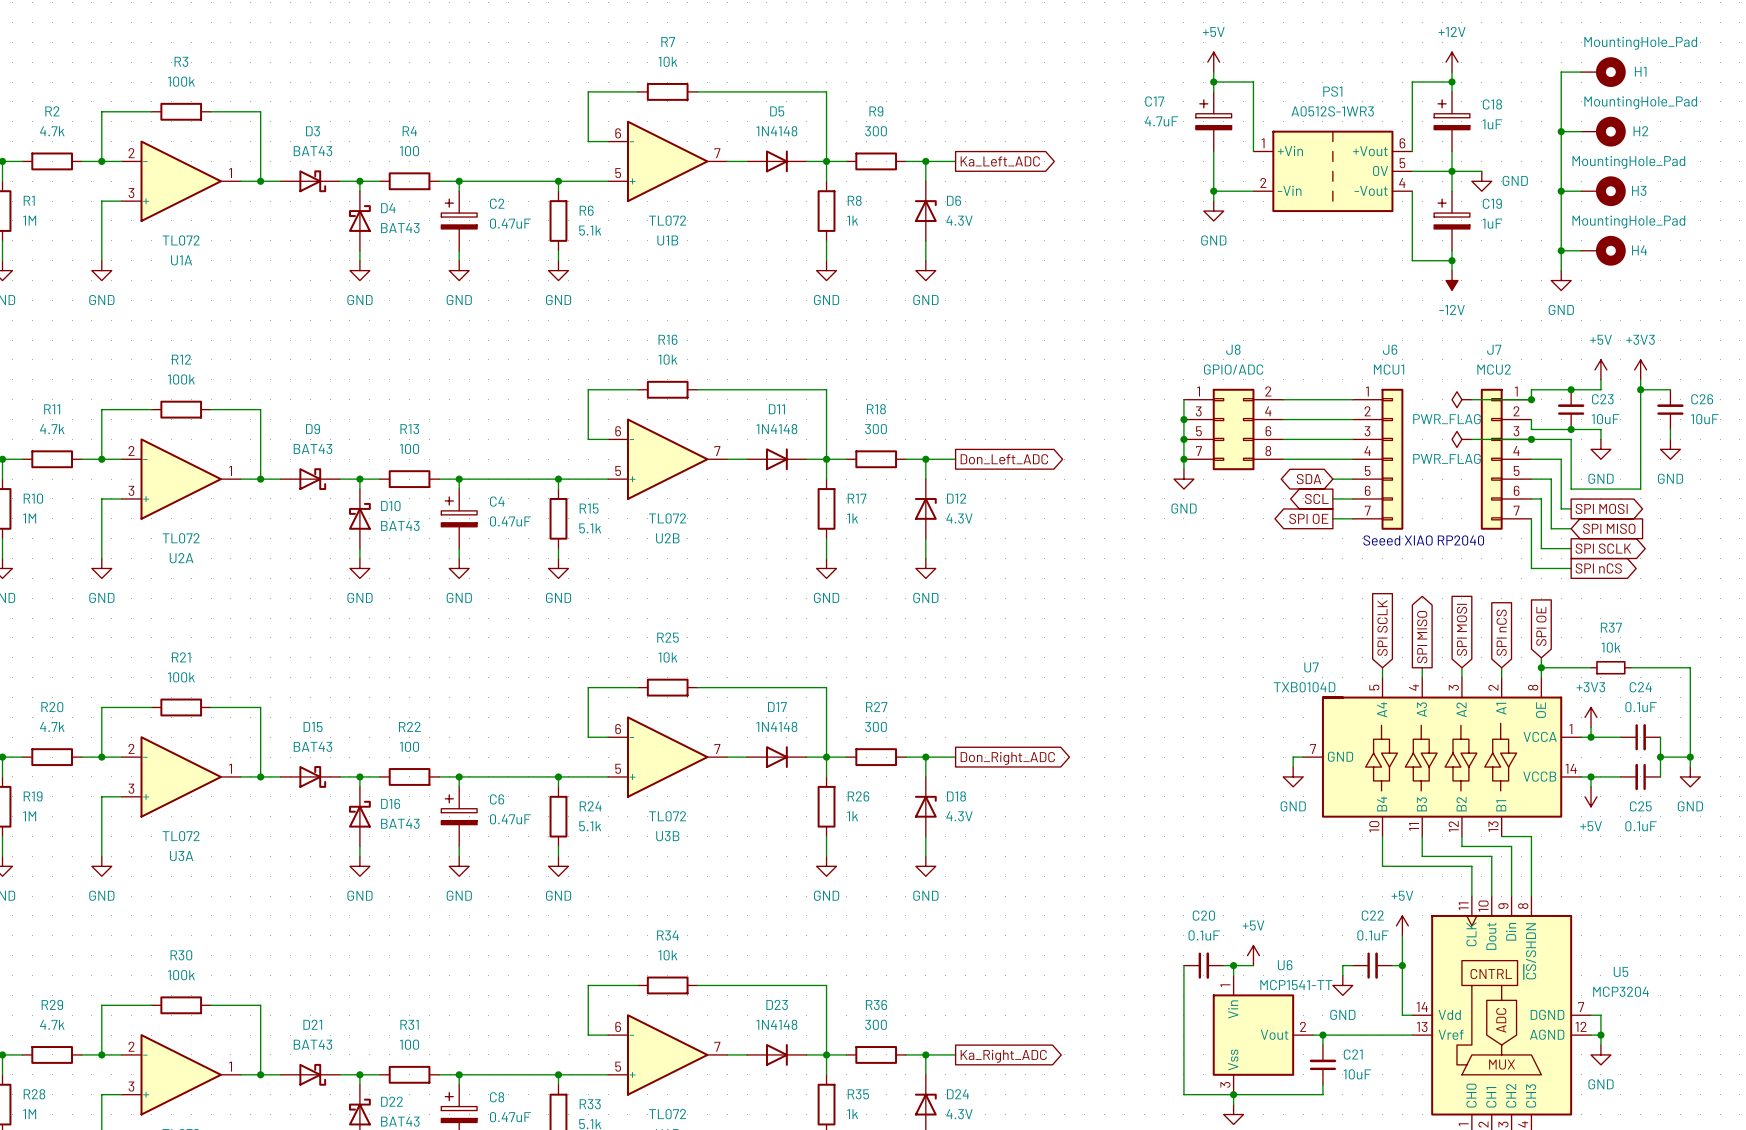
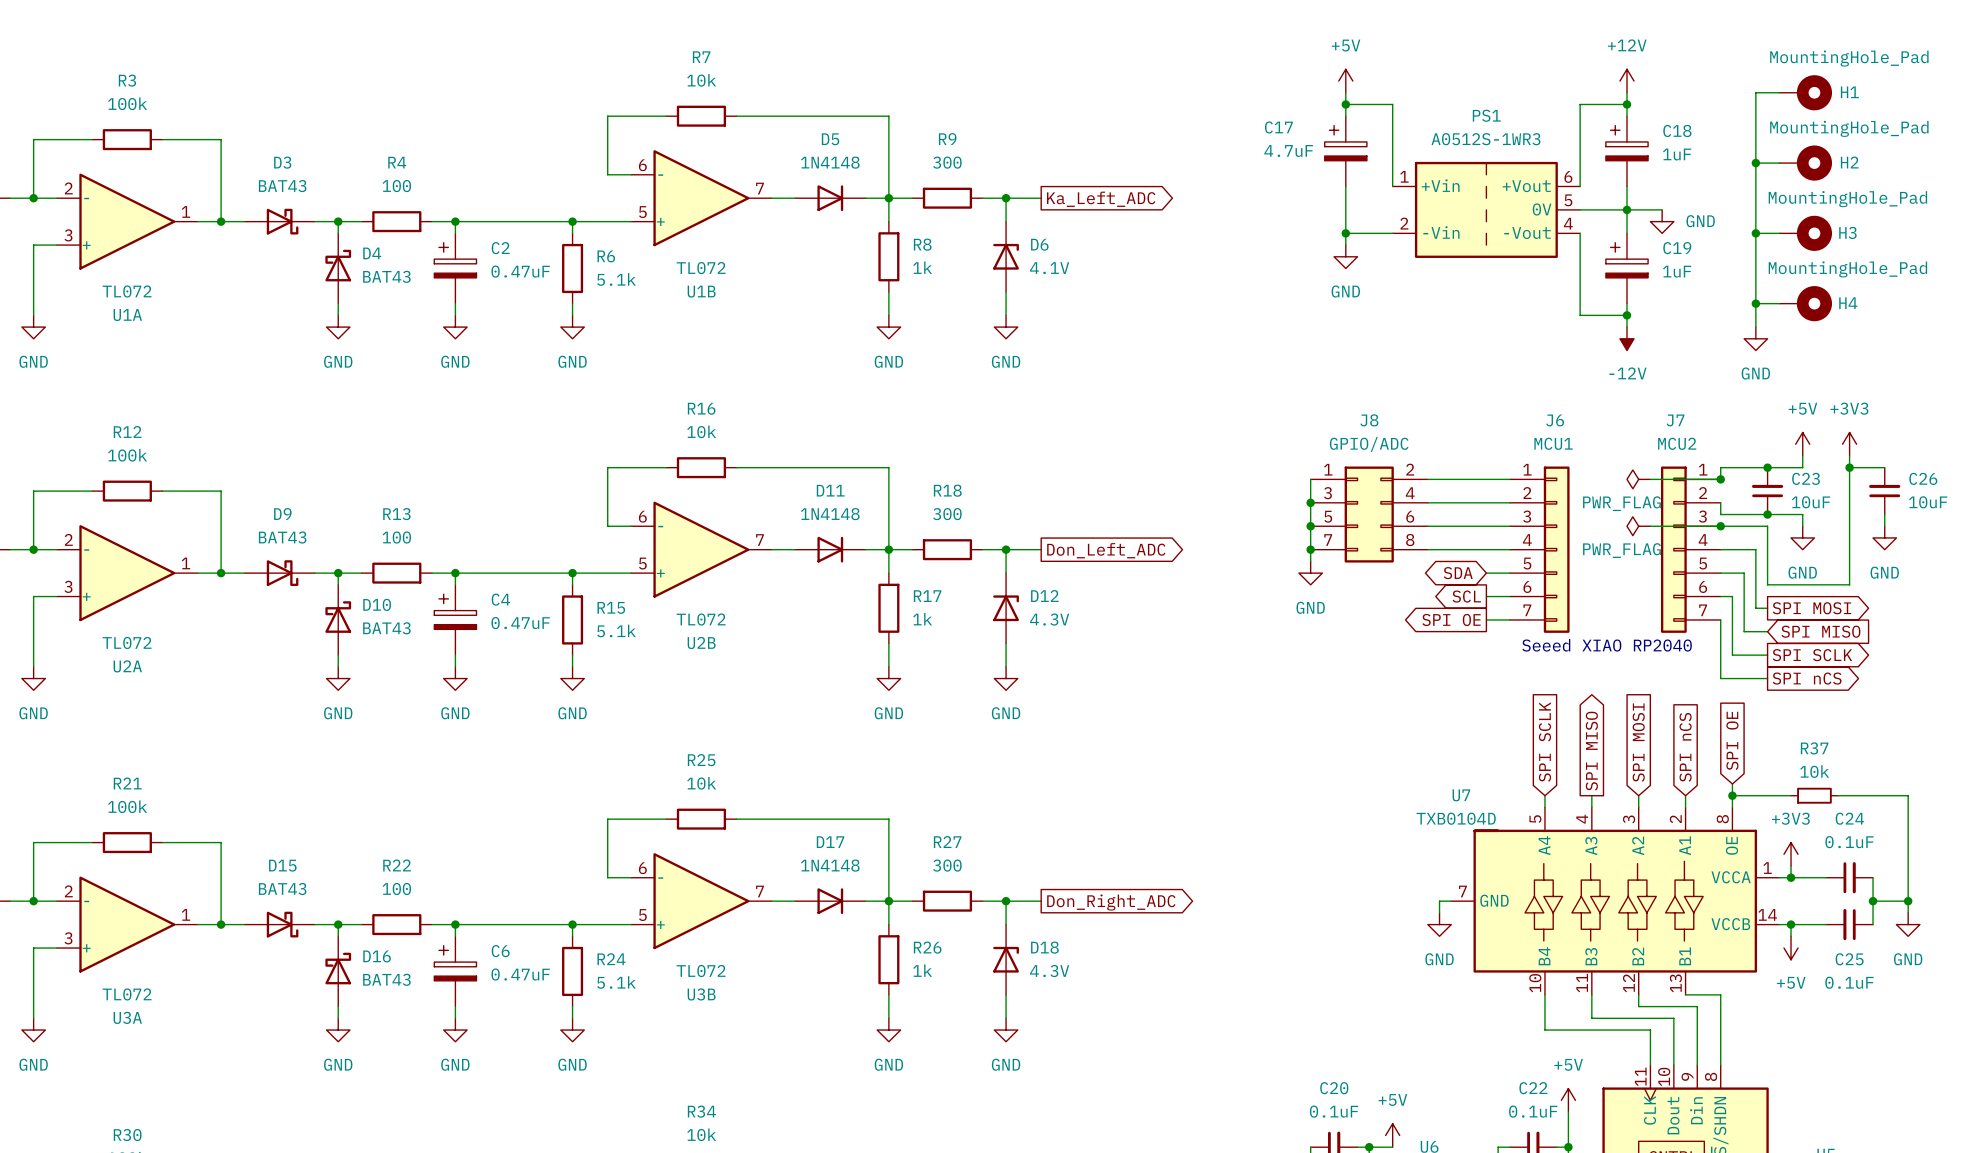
D6 value: 4.3V (959, 220) -> 4.1V (1049, 268)

